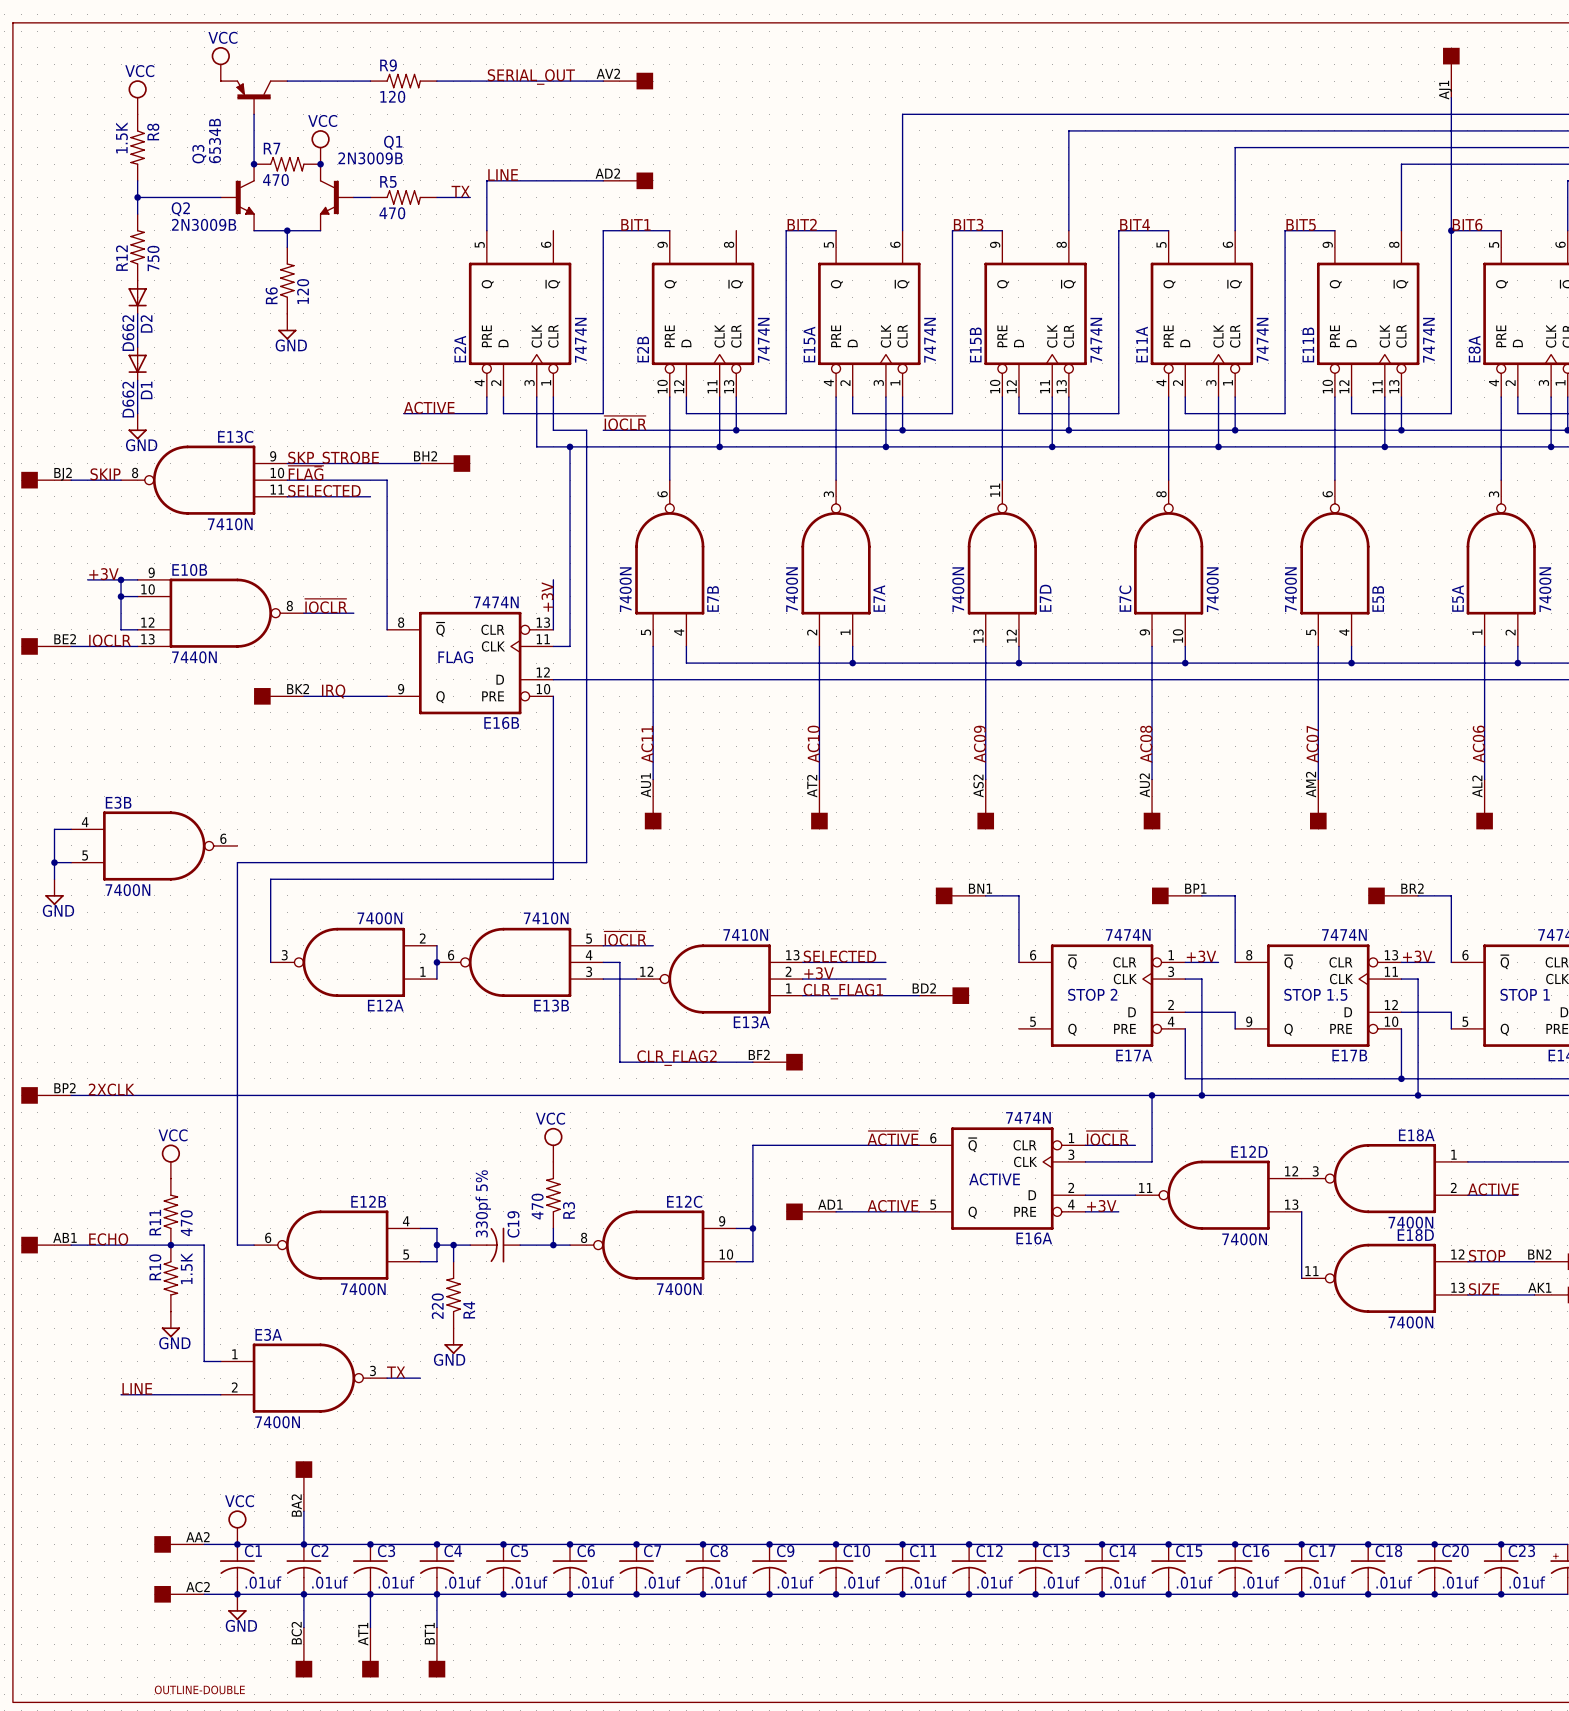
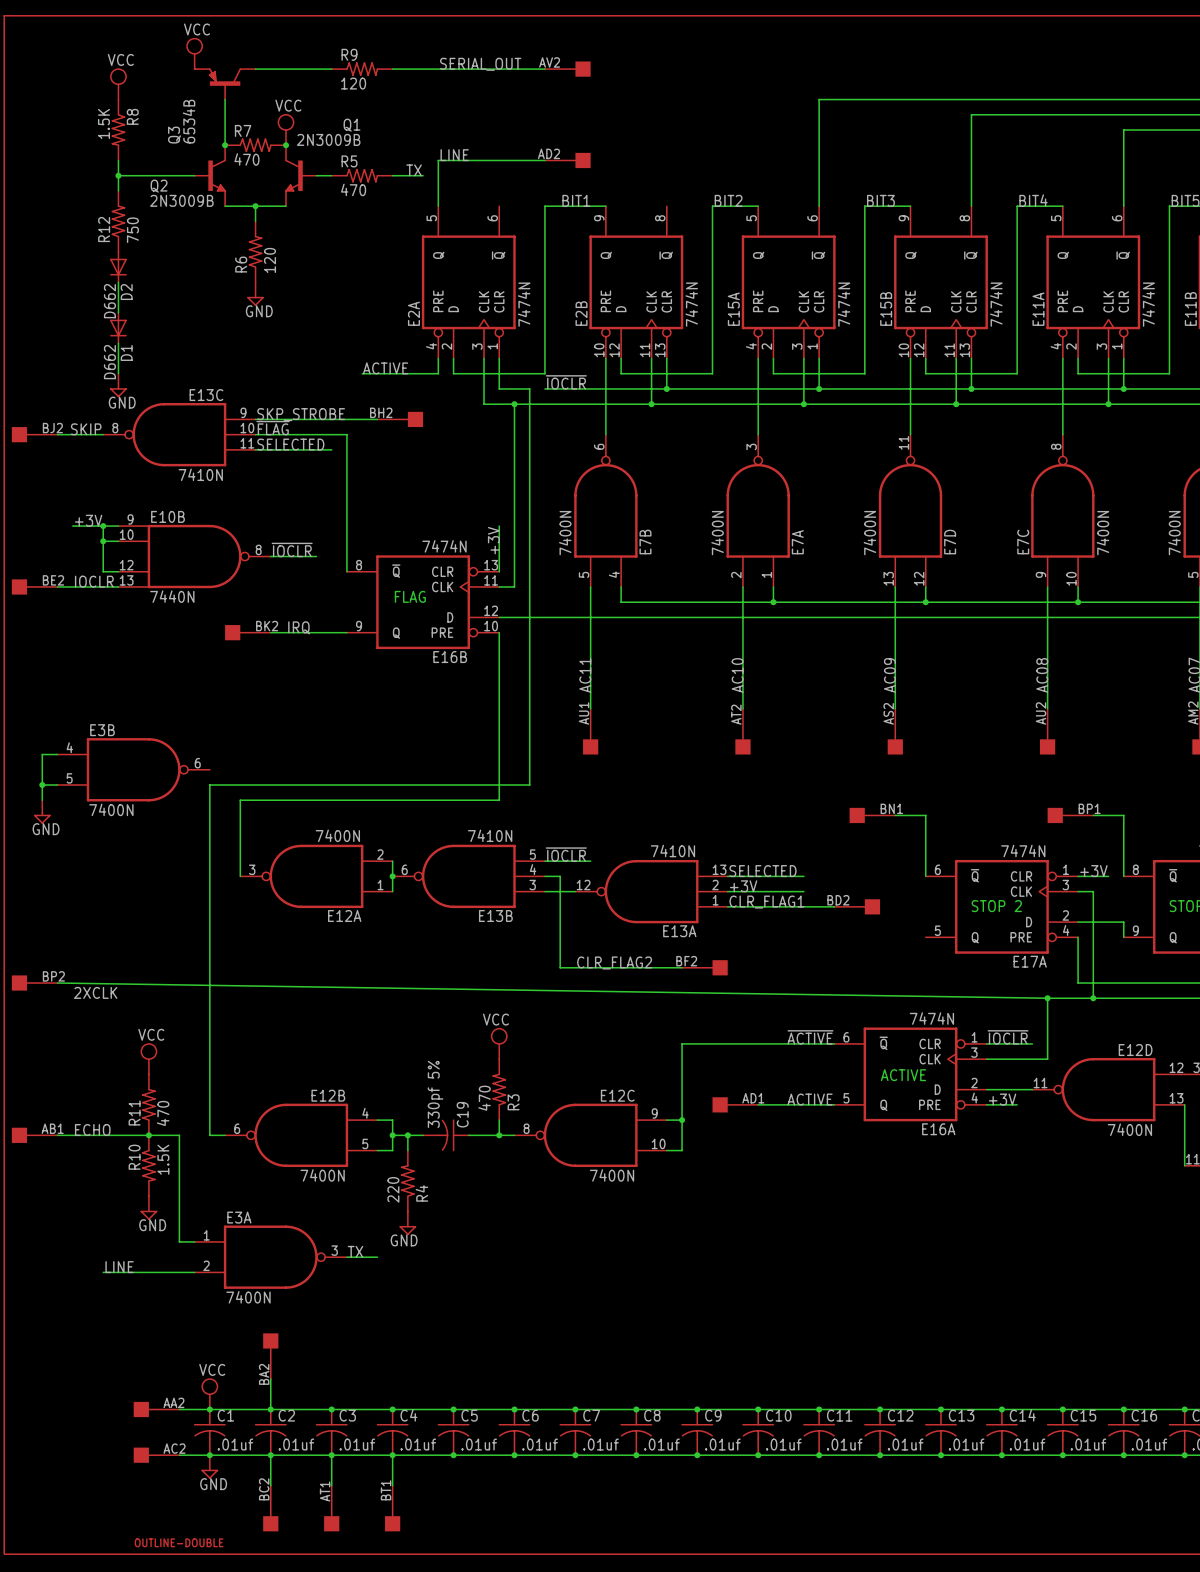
part position: (46, 1095) -> (34, 983)
wire: (71, 1095) (1152, 1095) -> (57, 983) (1047, 998)

